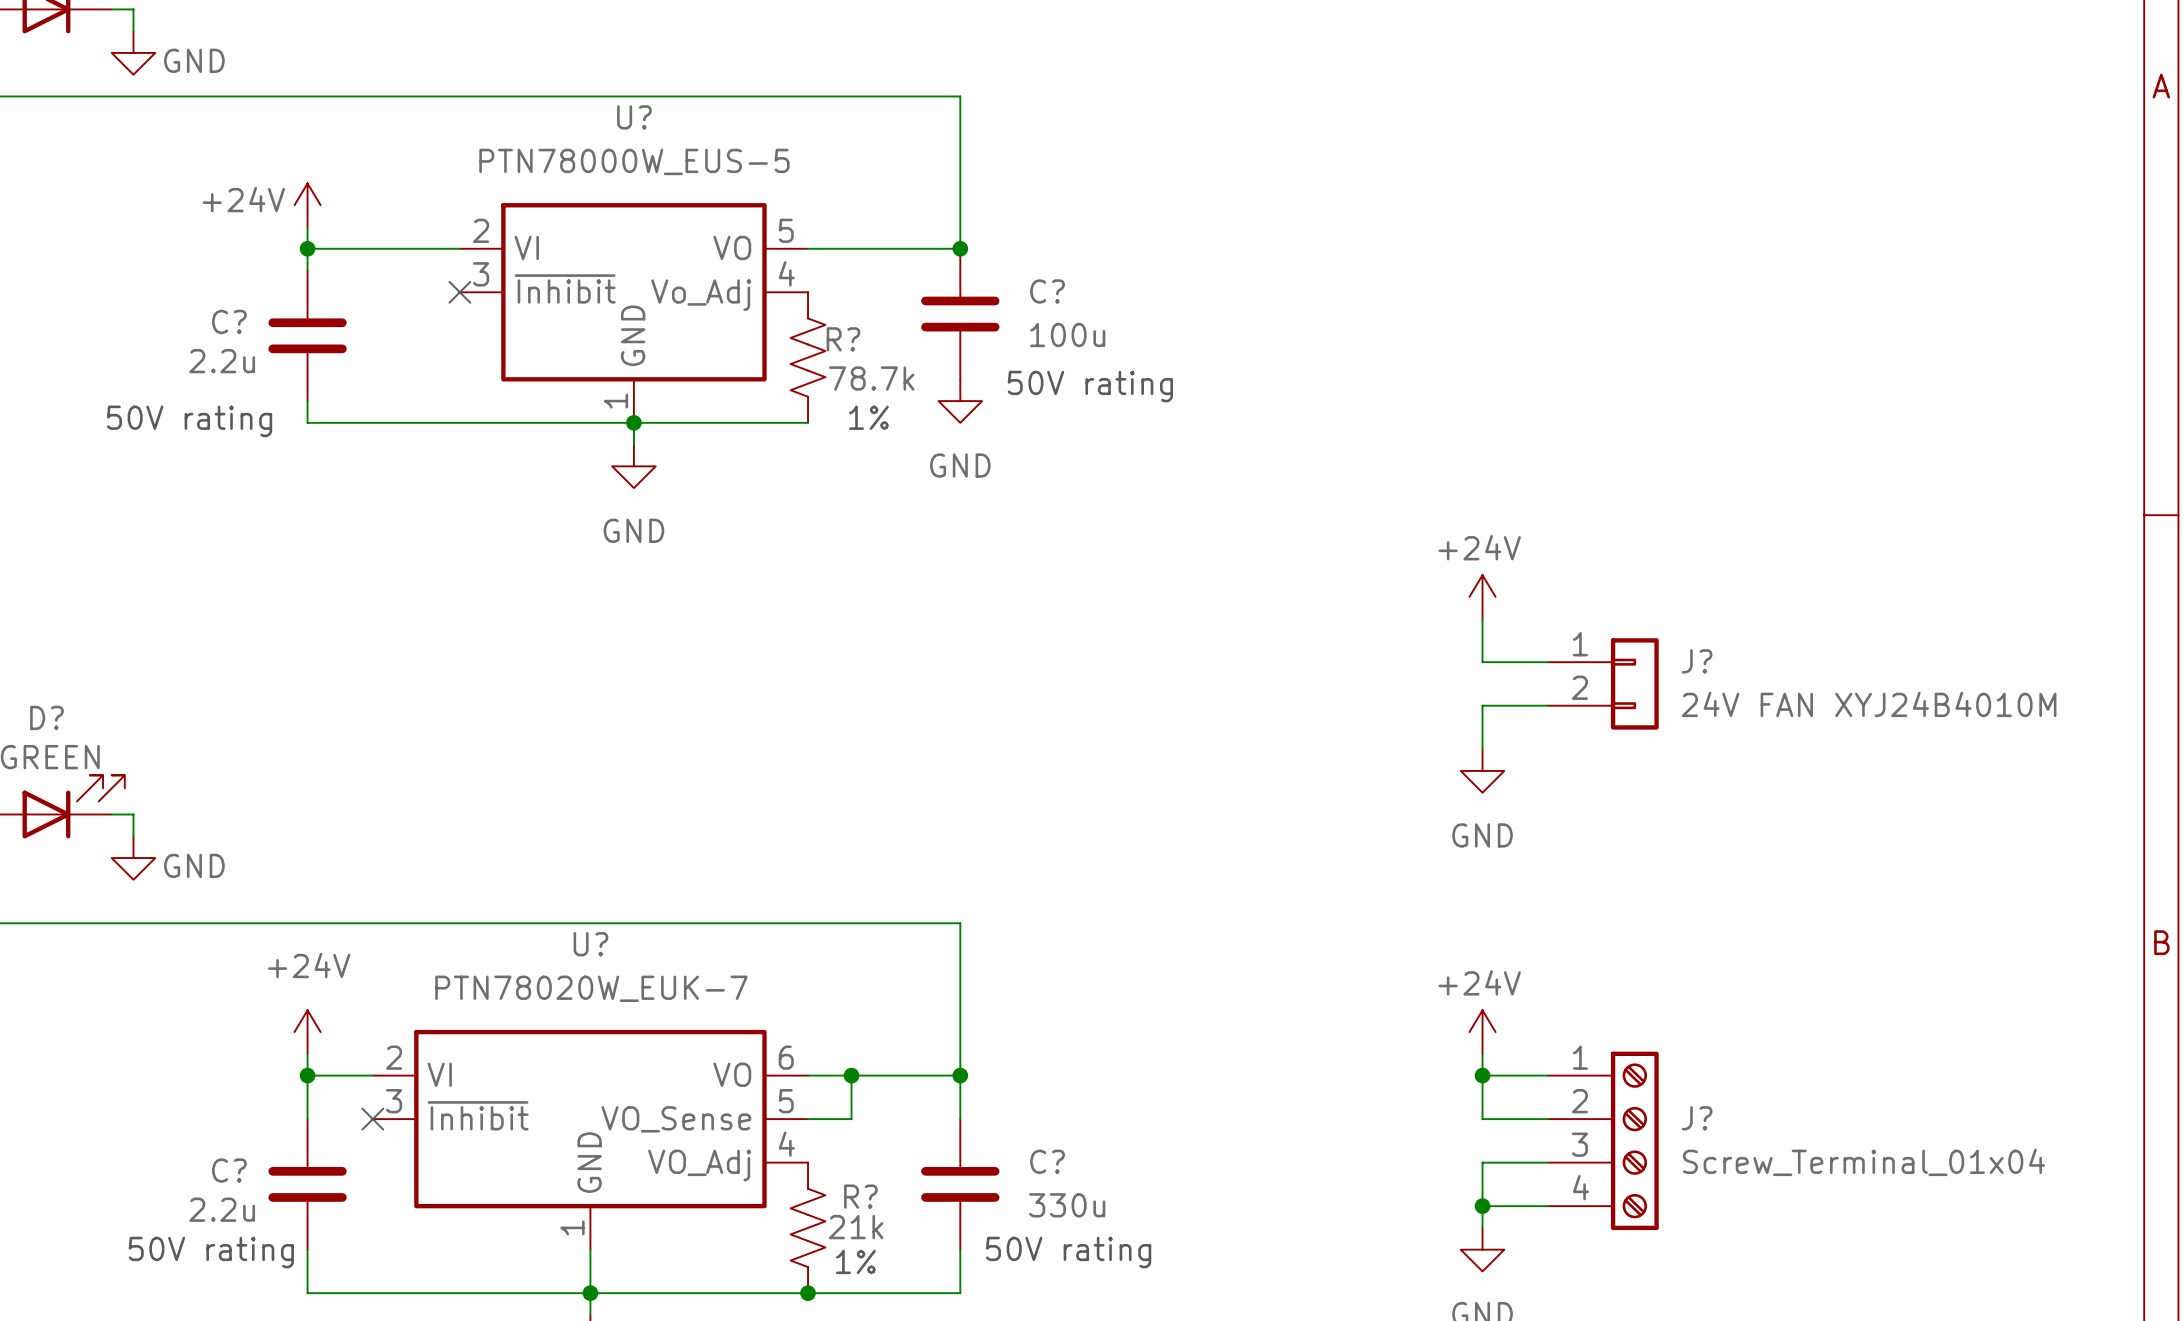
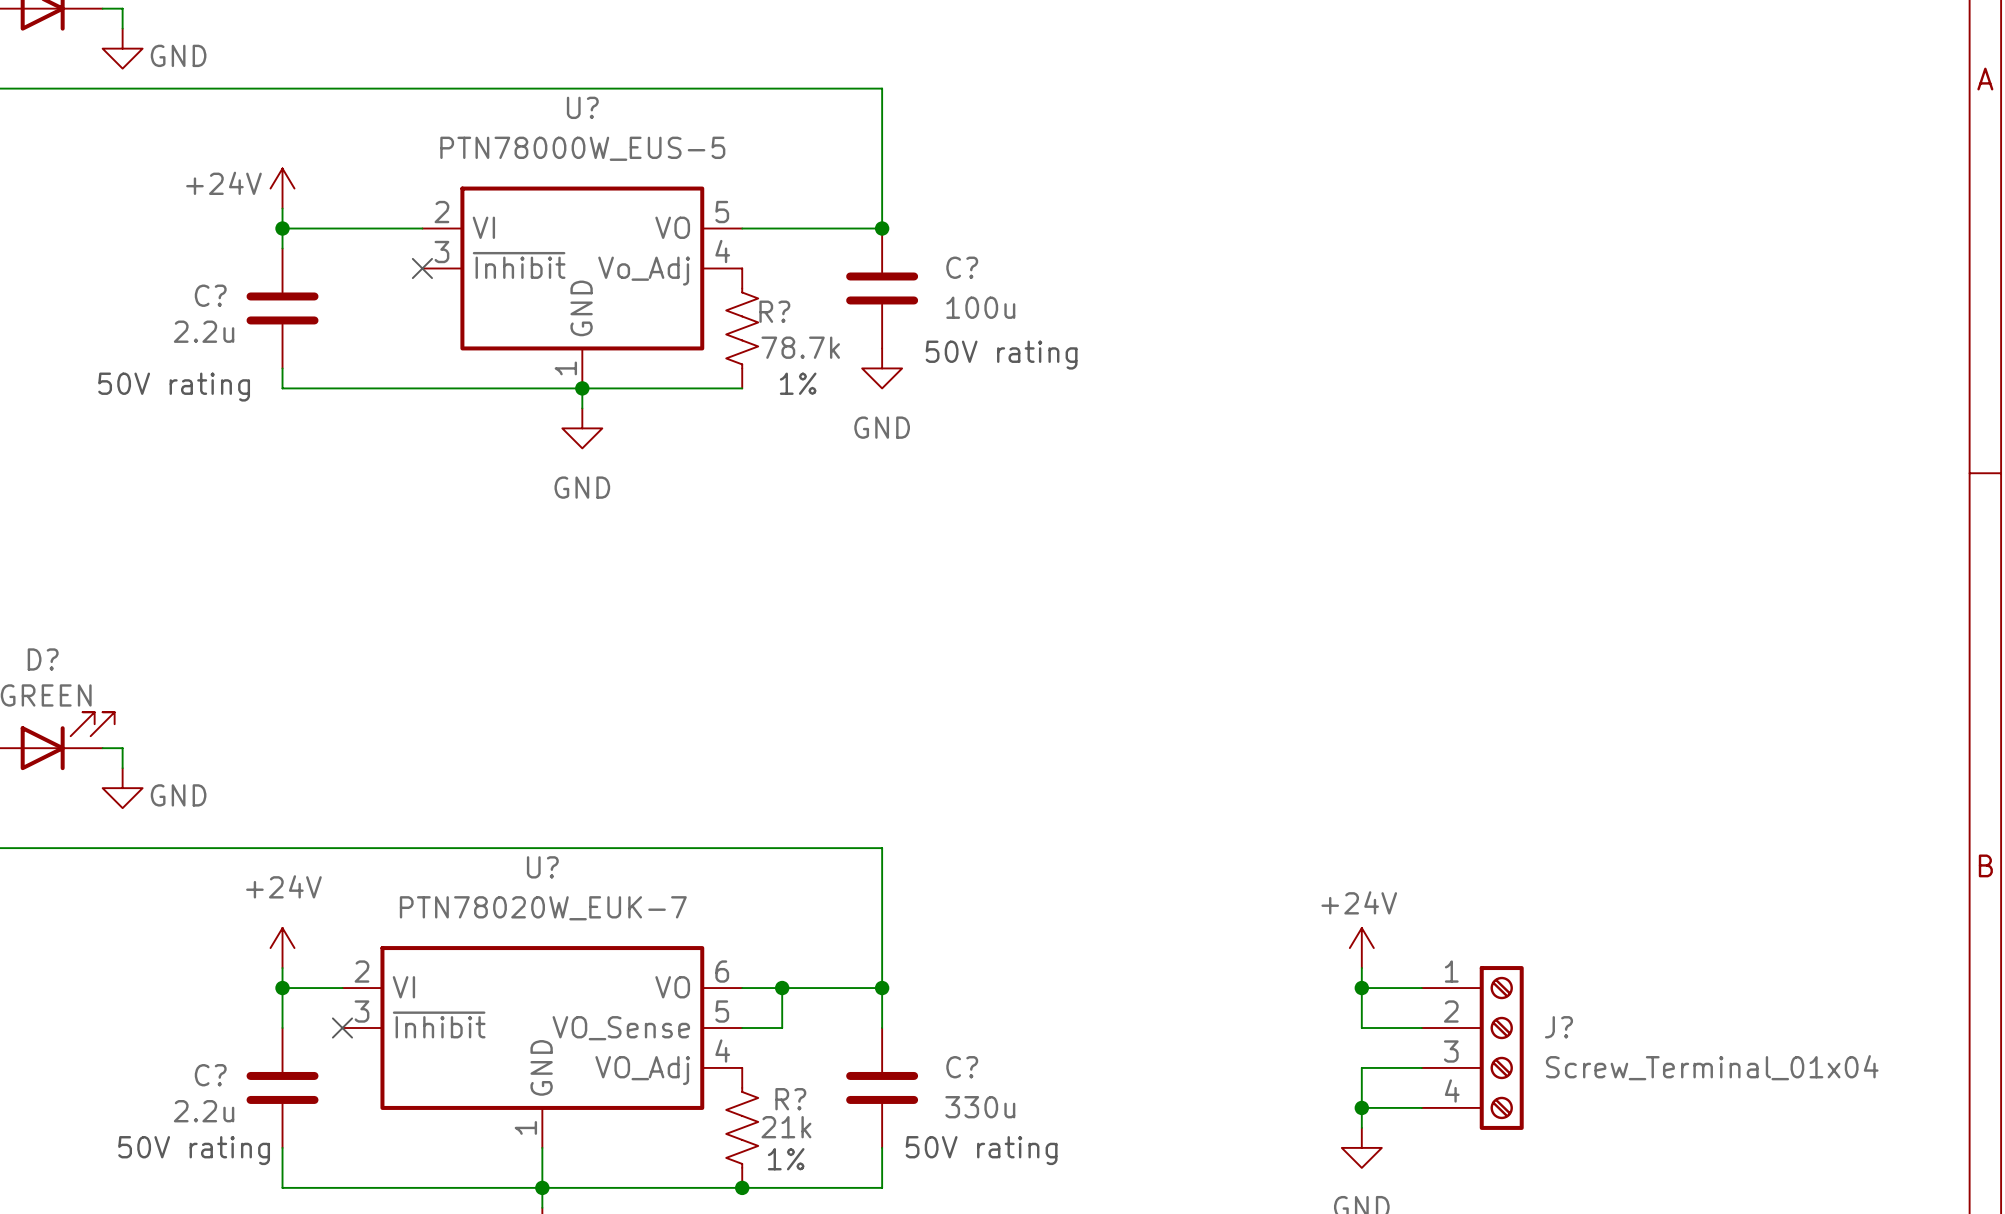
power symbol: +24V (1482, 596) -> none
wire: (1482, 618) (1482, 662) (1547, 662) -> none
J?: 24V FAN XYJ24B4010M (1603, 683) -> none
wire: (1547, 705) (1482, 705) (1482, 749) -> none
power symbol: GND (1482, 770) -> none

